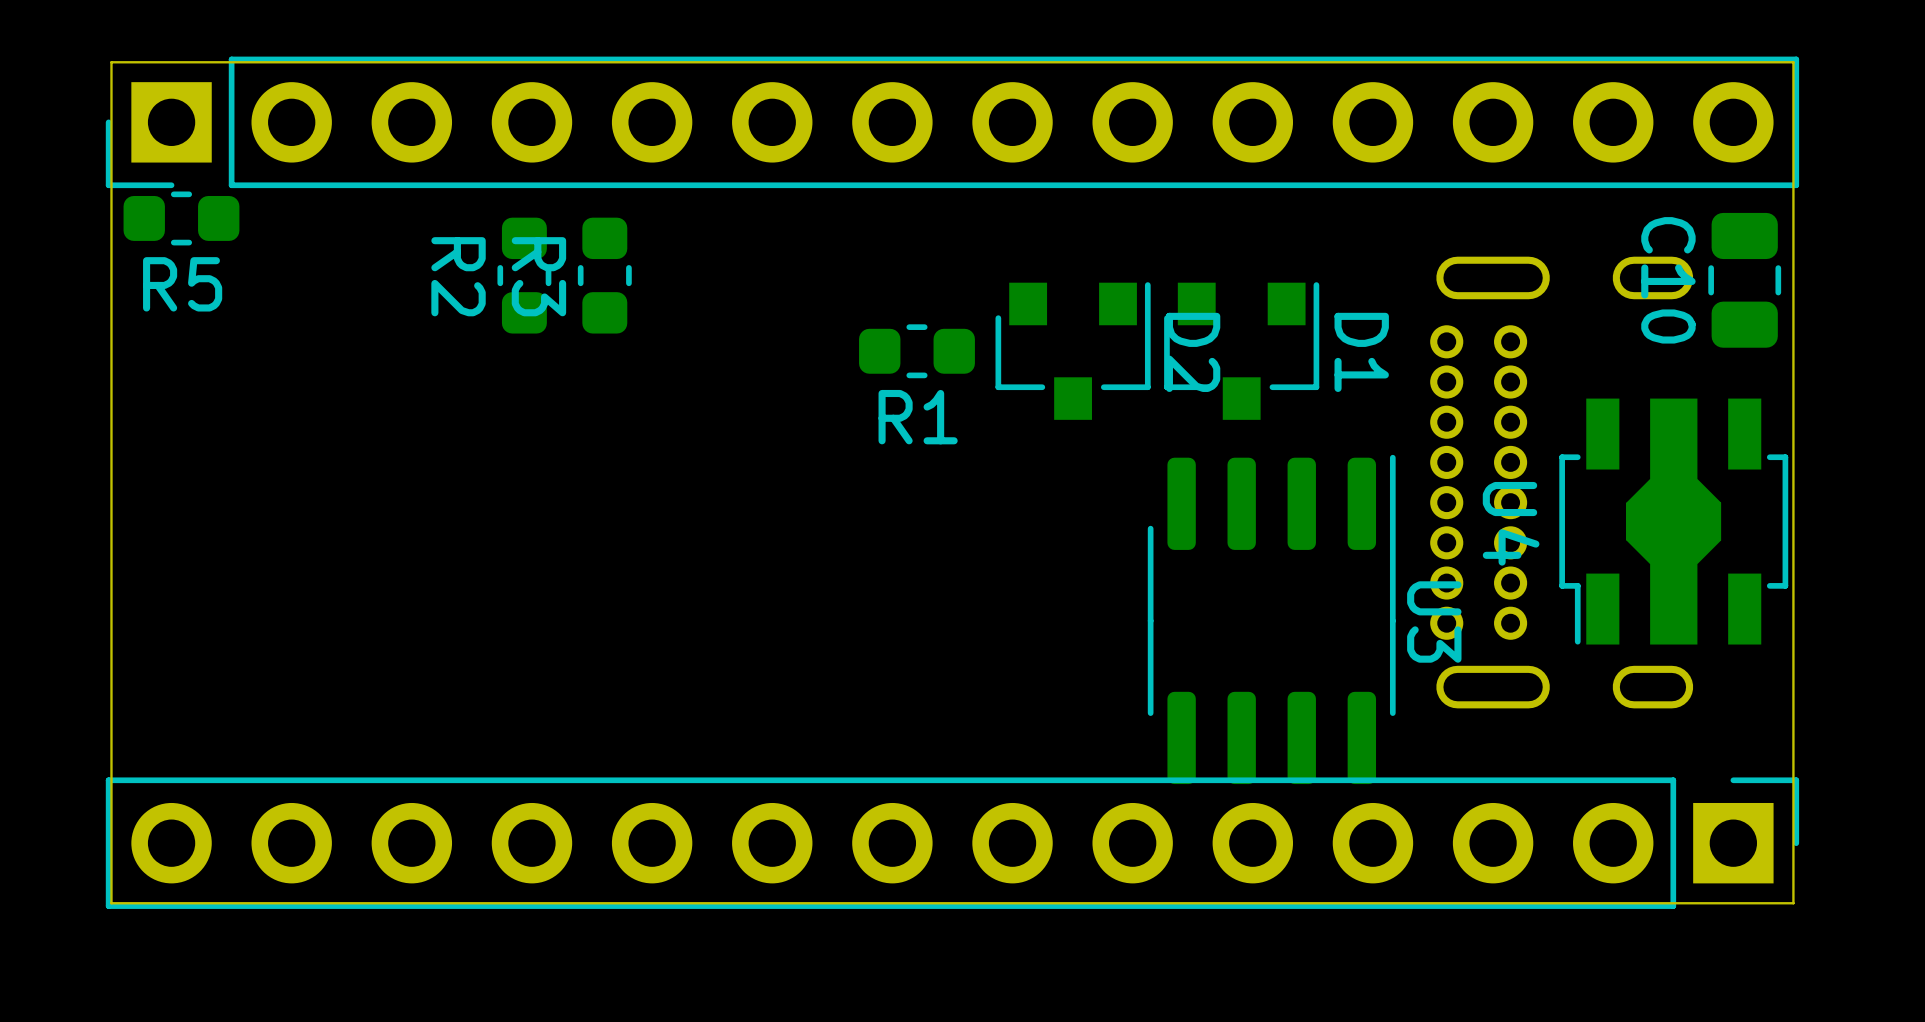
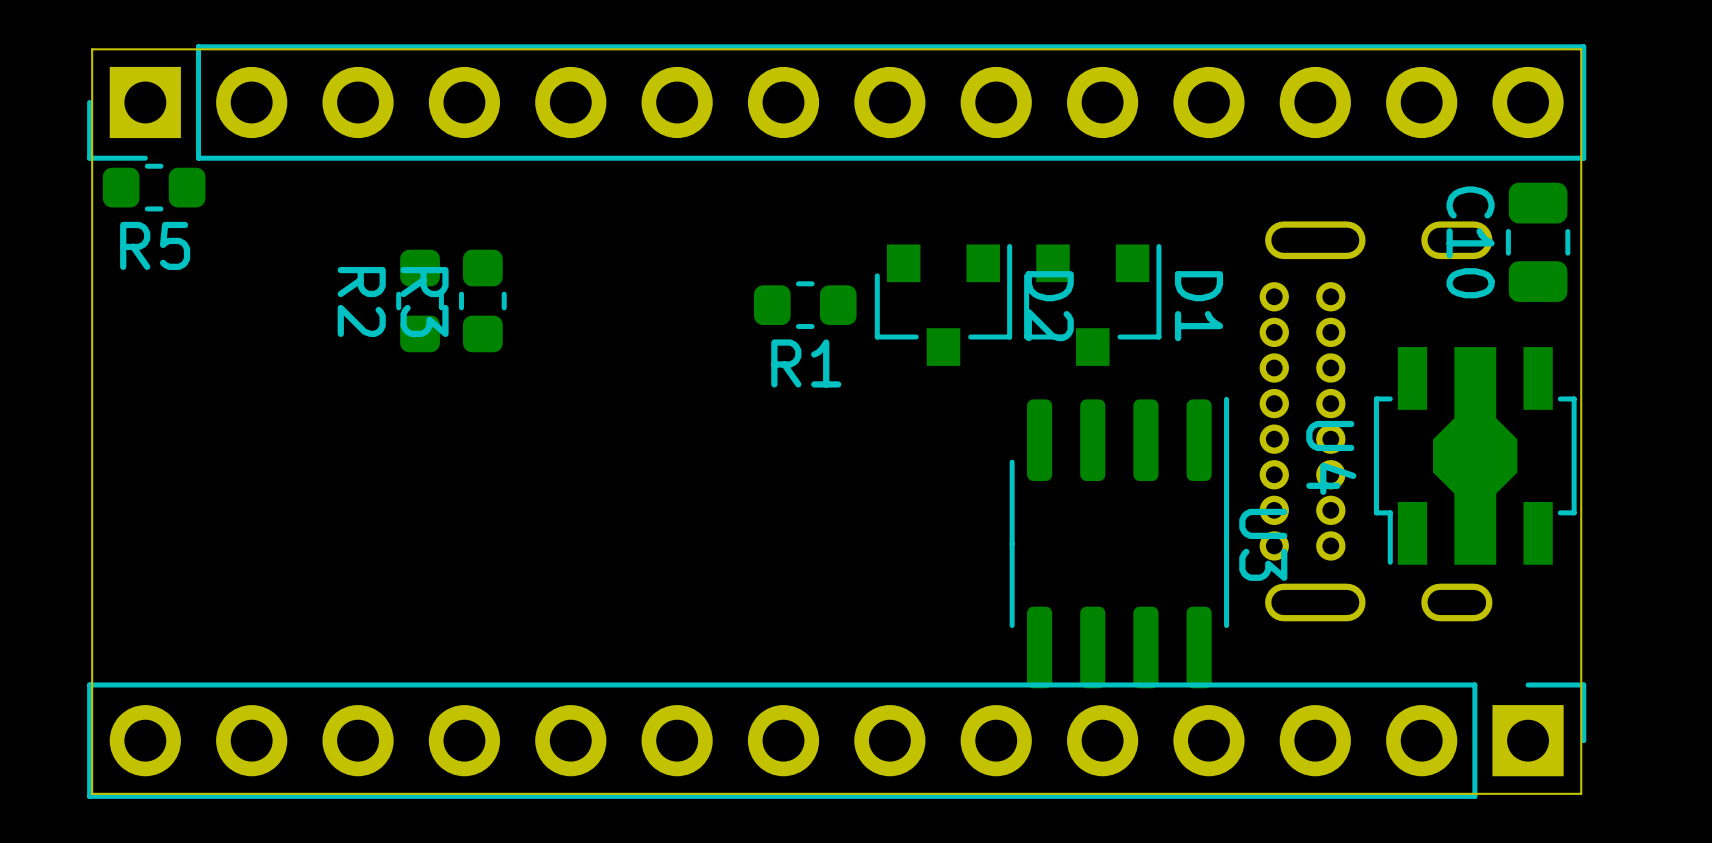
R2 position: (524, 275) -> (420, 300)
R3 position: (604, 275) -> (482, 300)

